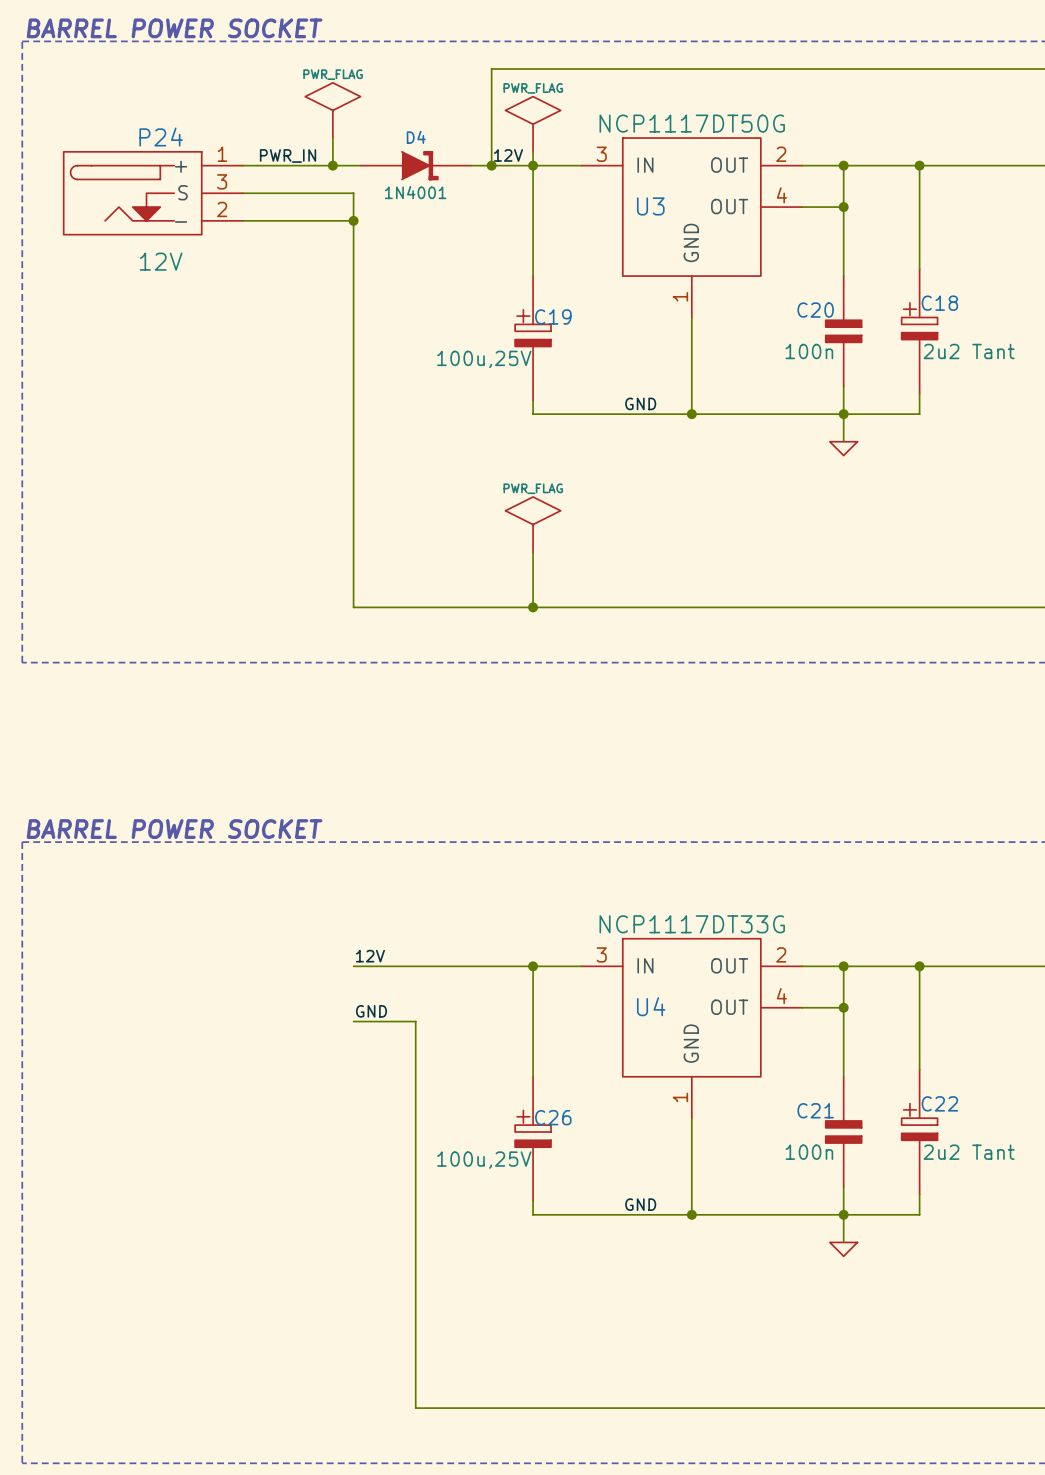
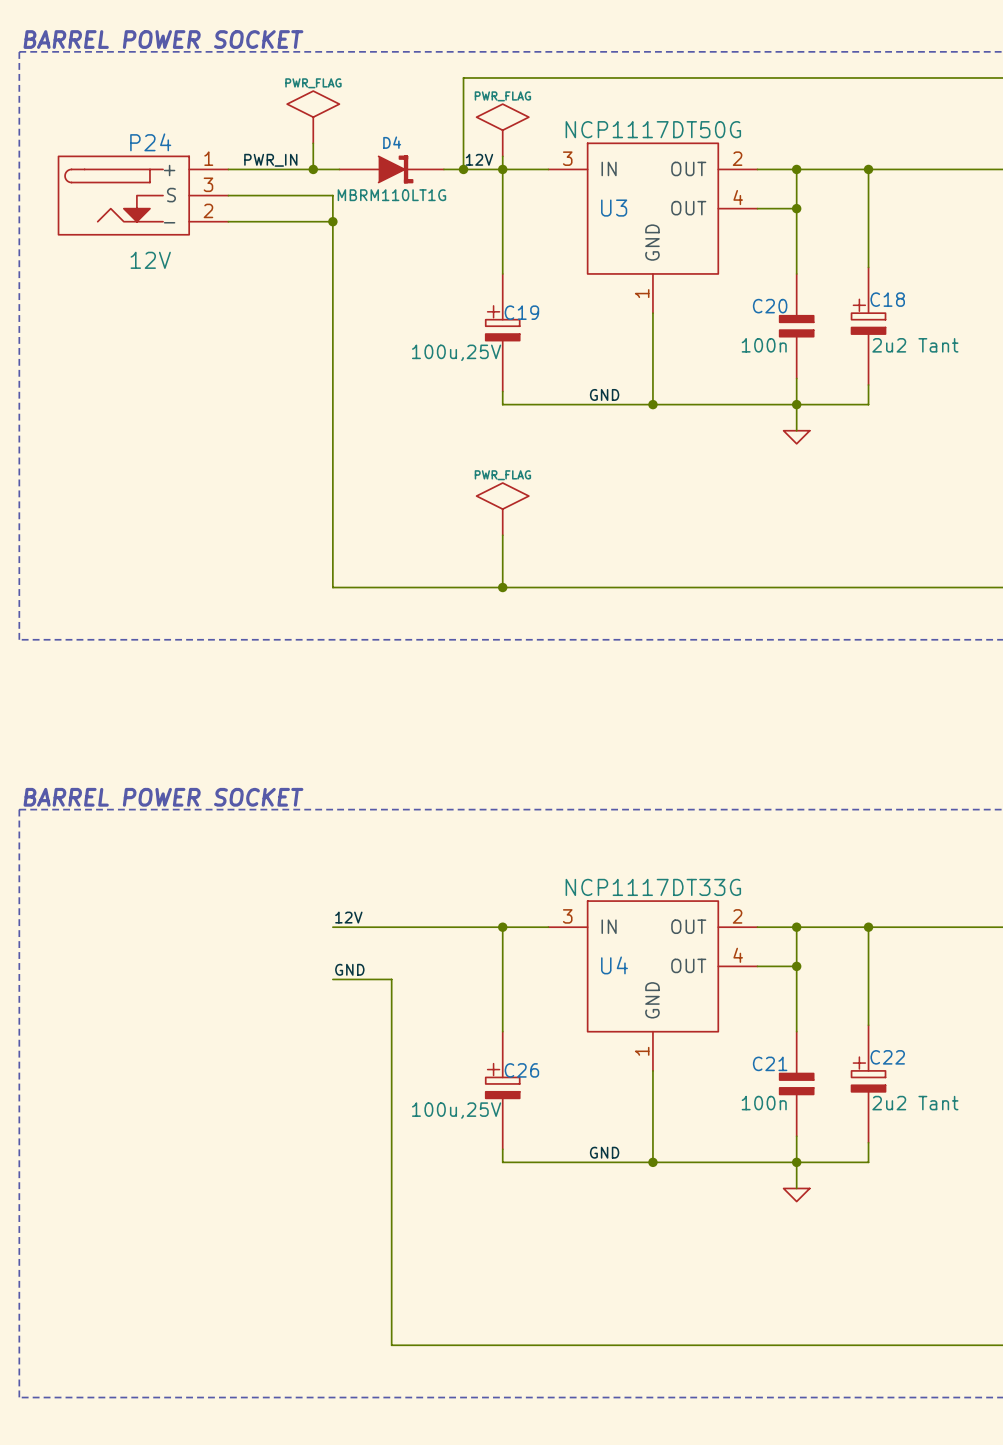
D4 value: 1N4001 (415, 192) -> MBRM110LT1G (391, 195)

